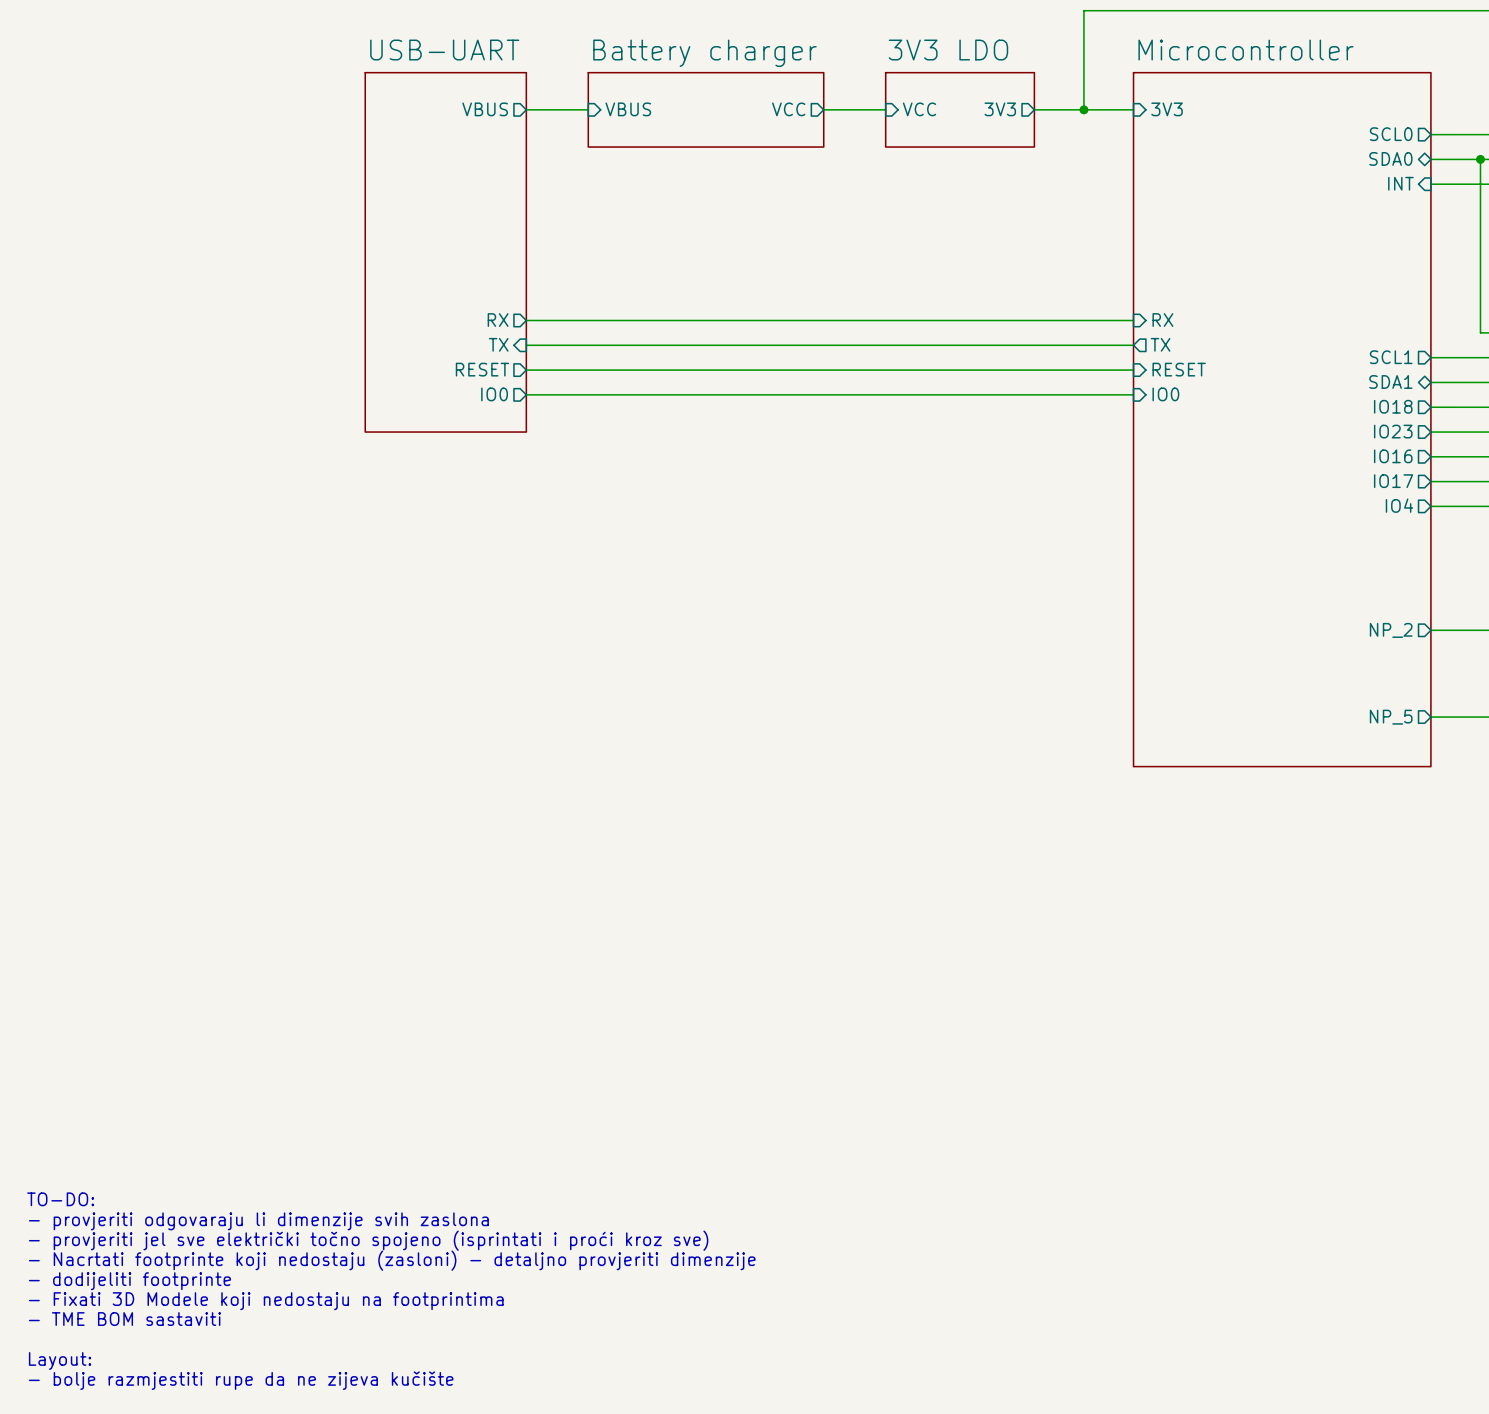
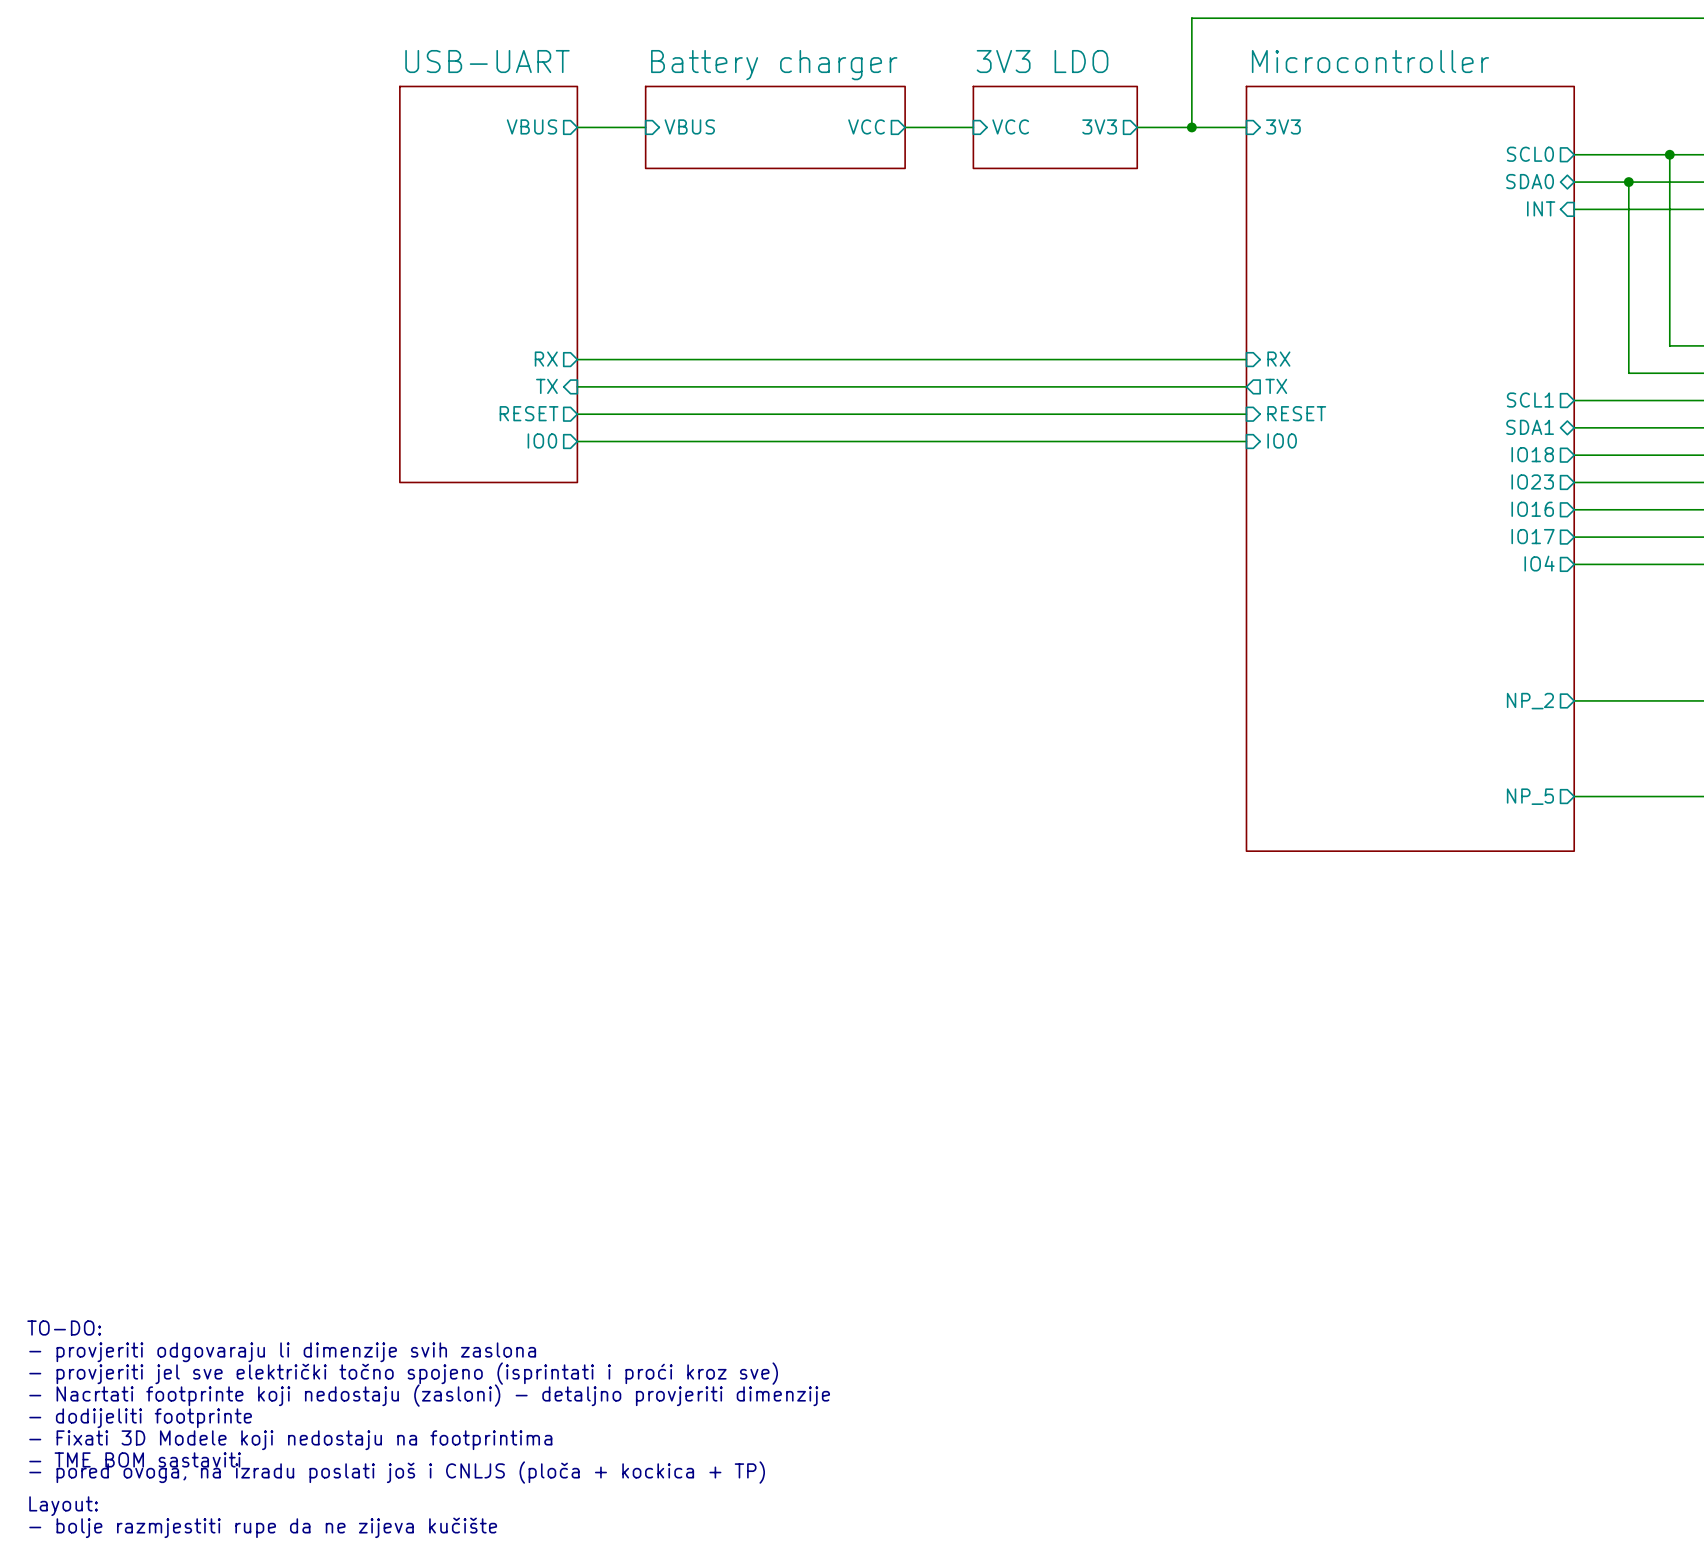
text: none -> - pored ovoga, na izradu poslati još i CNLJS (ploča + kockica + TP) (397, 1472)

